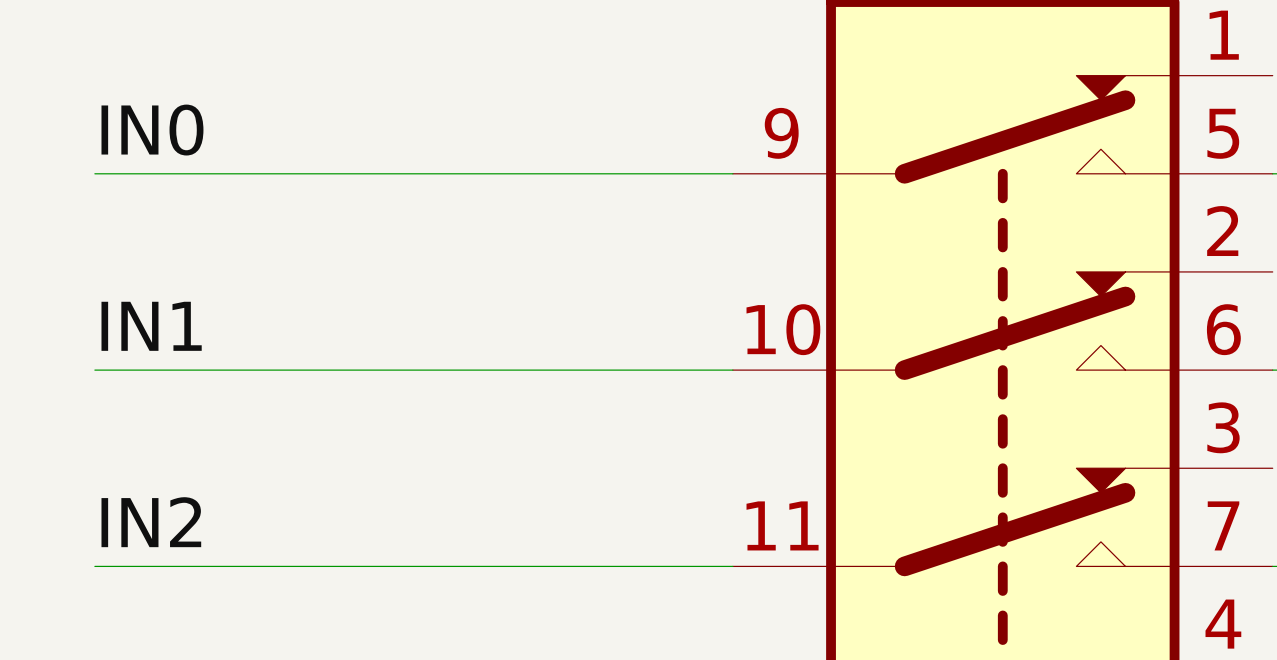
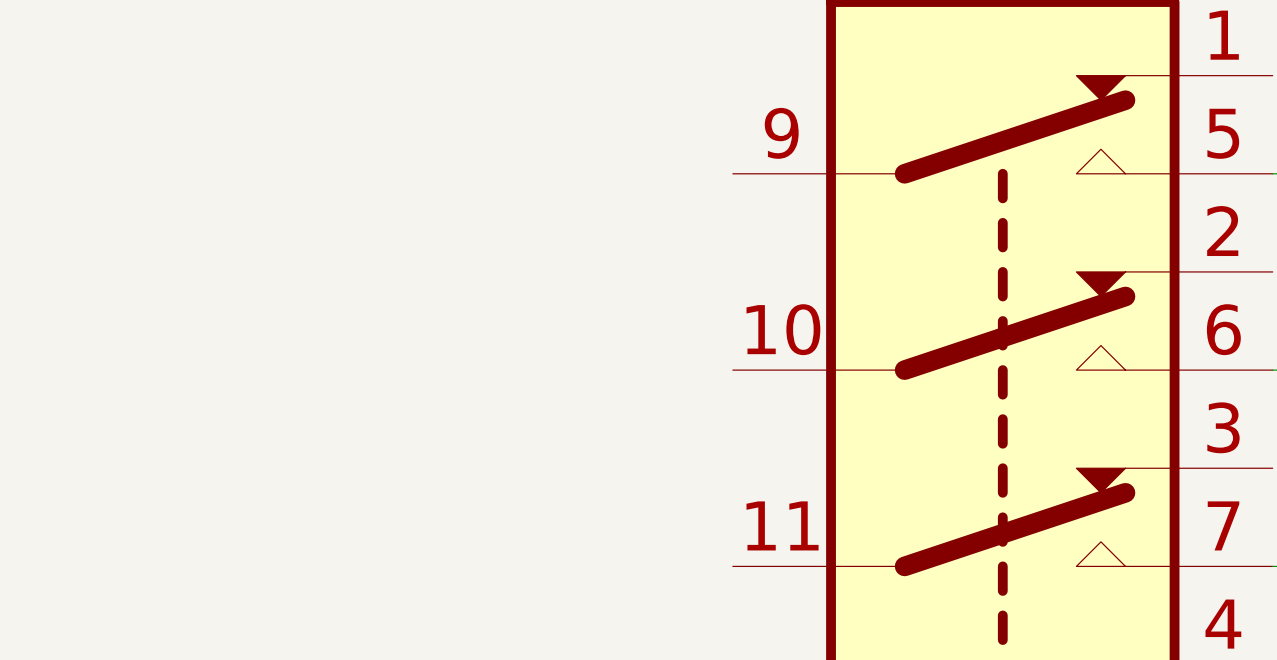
label: IN0 (152, 130) -> none
wire: (94, 173) (732, 173) -> none
label: IN1 (151, 326) -> none
wire: (94, 370) (732, 370) -> none
label: IN2 (151, 522) -> none
wire: (94, 566) (732, 566) -> none

